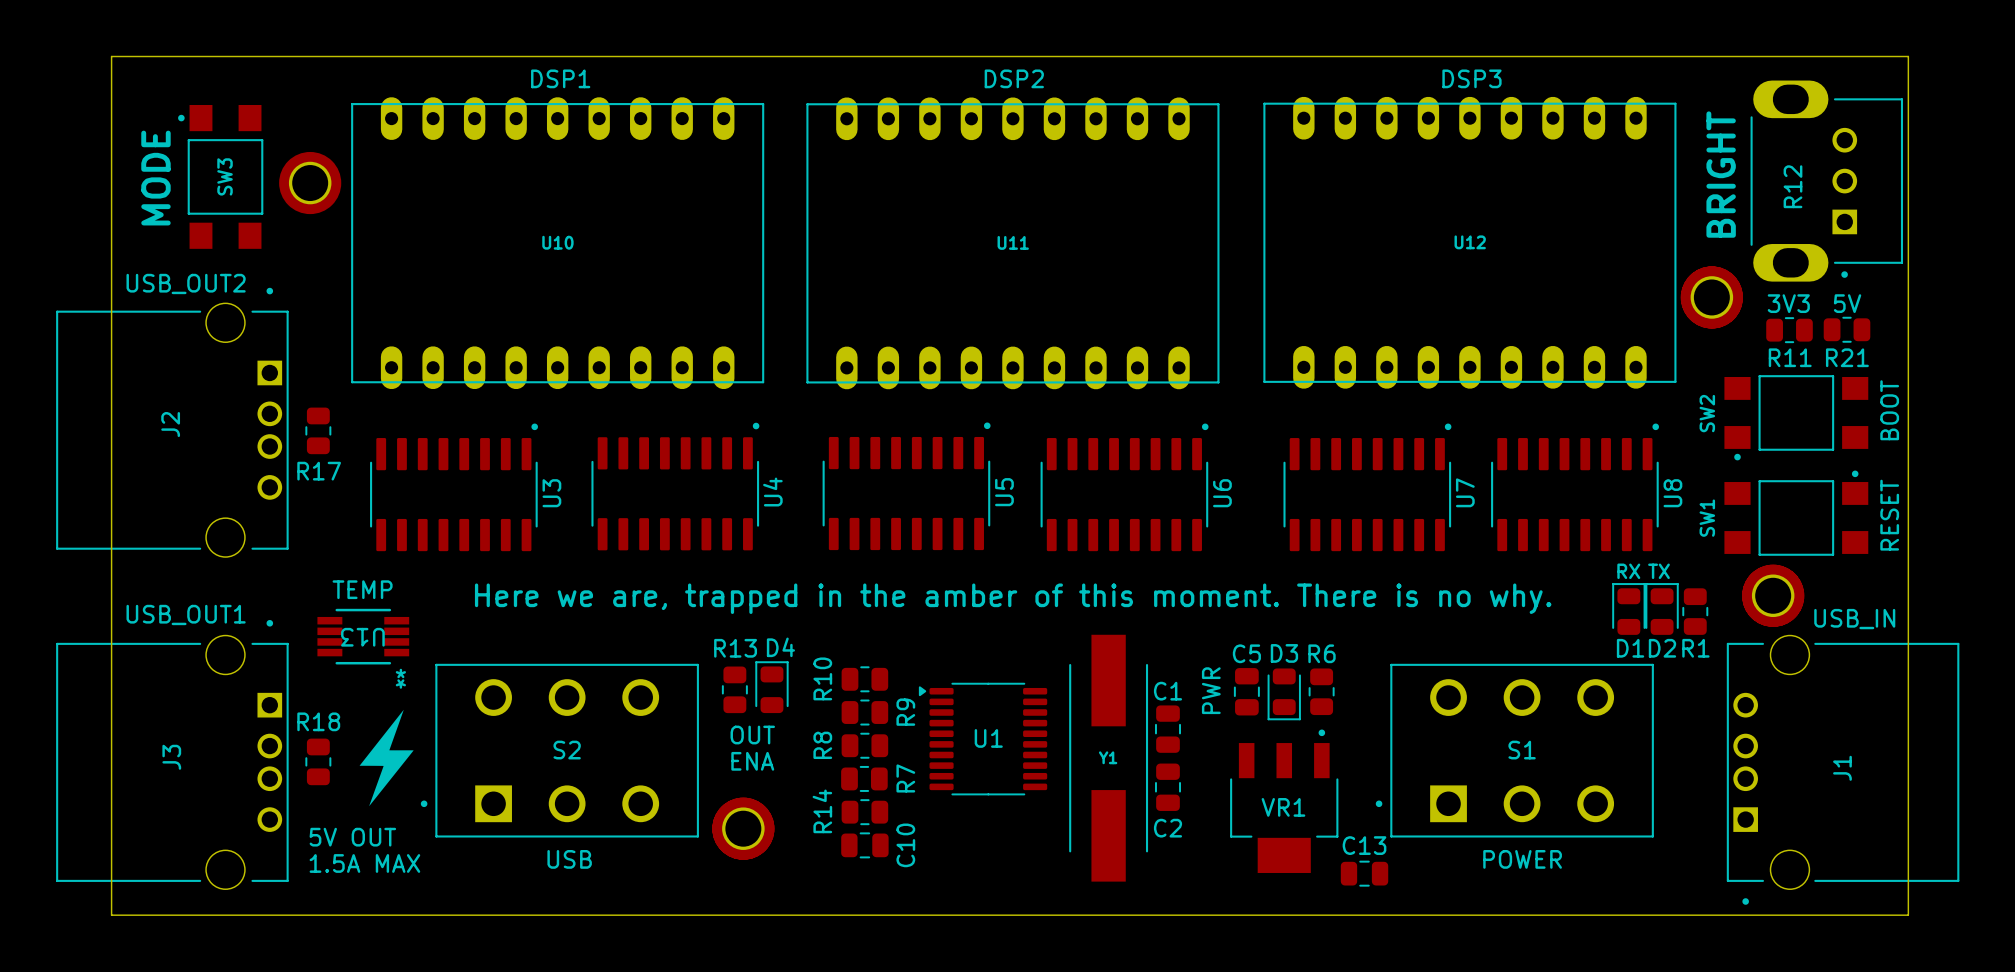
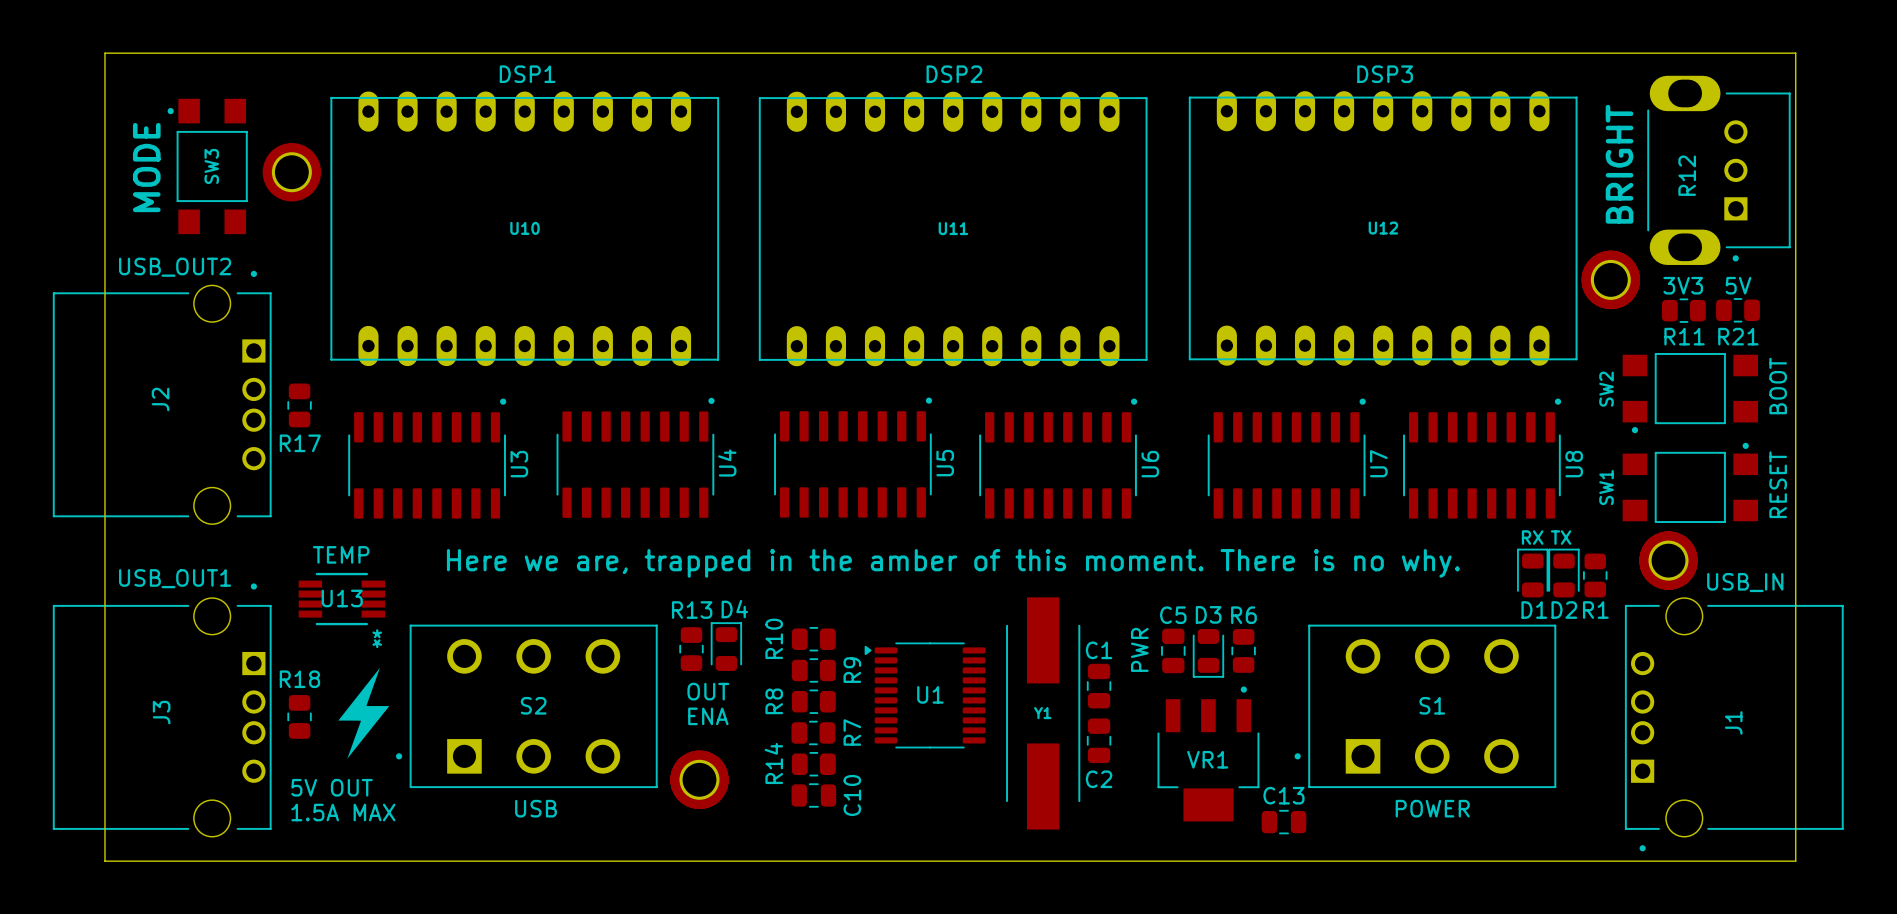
U13 name rotation: 0° (362, 637) -> 180° (342, 598)

